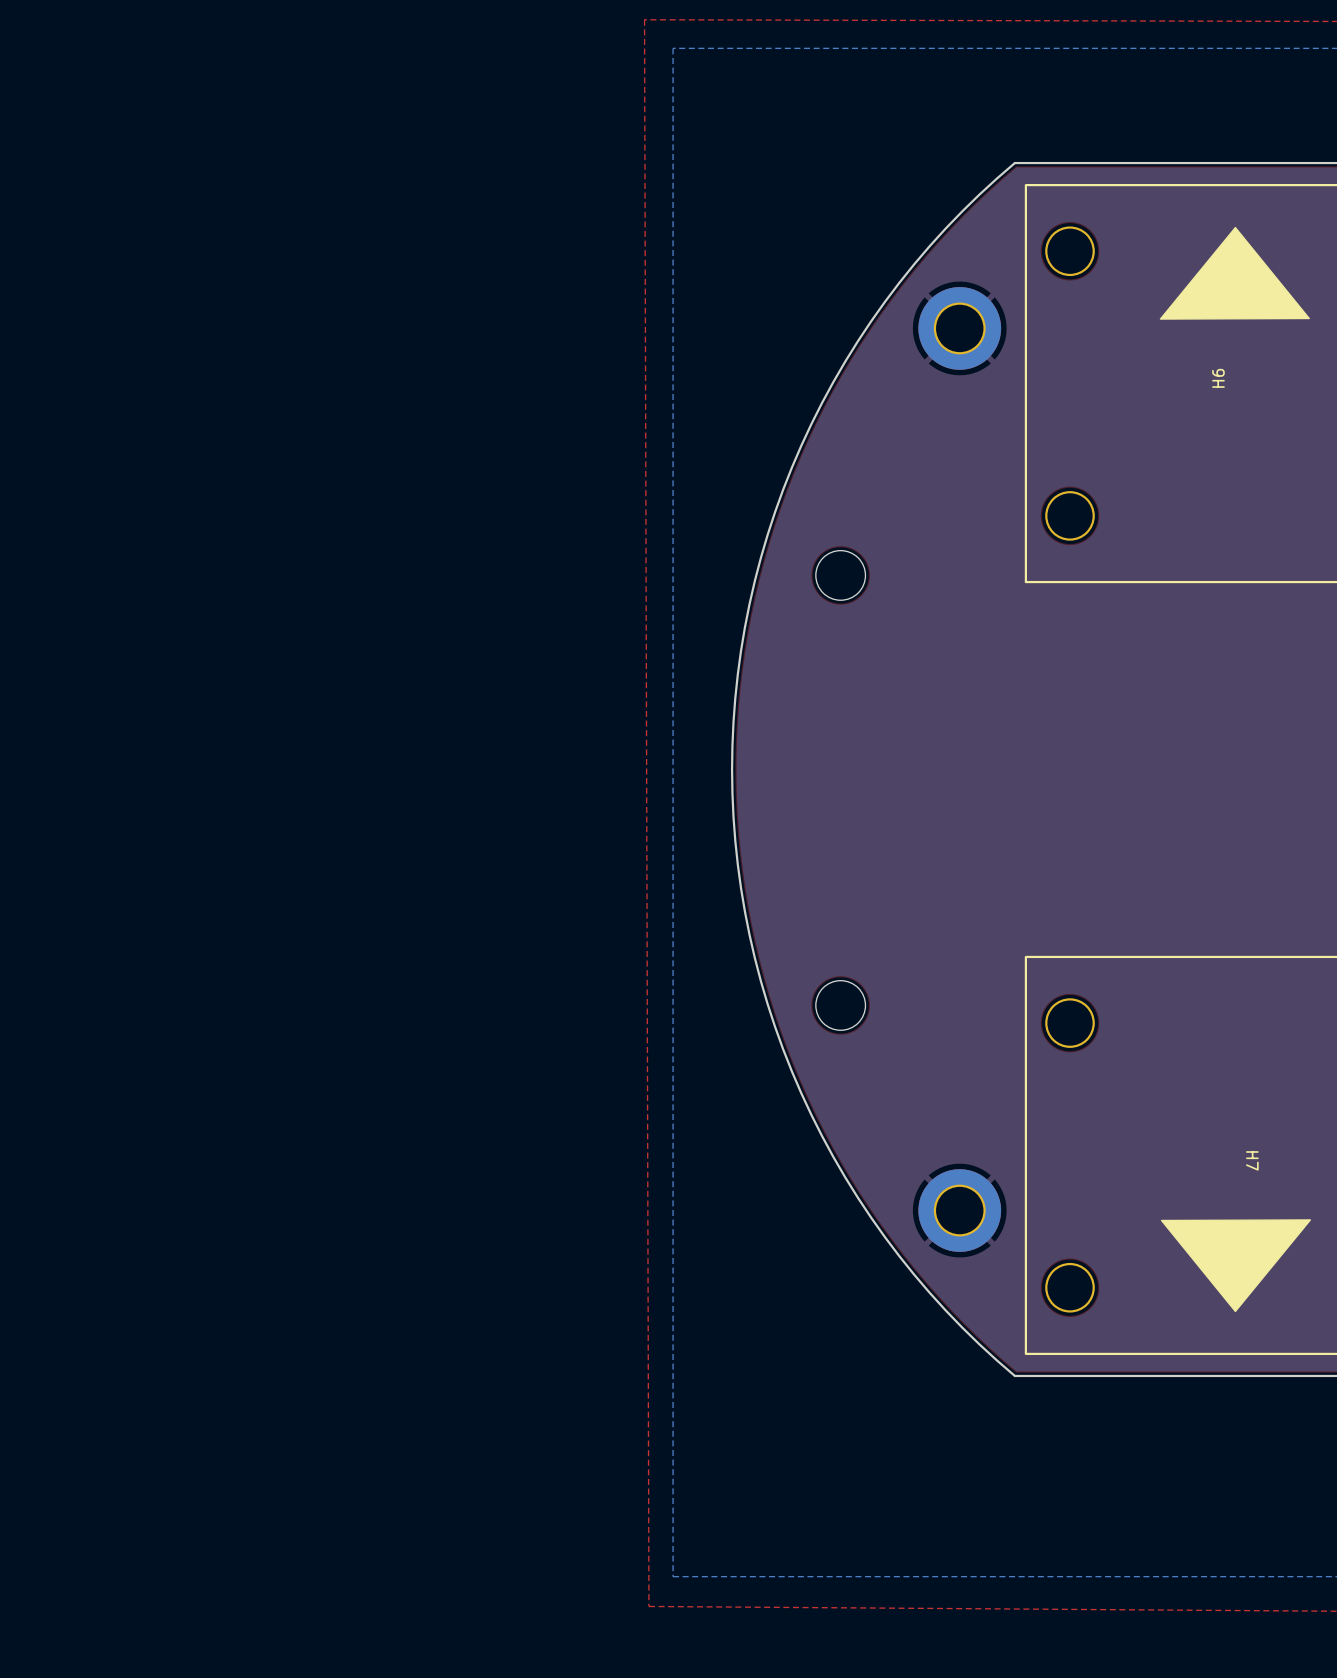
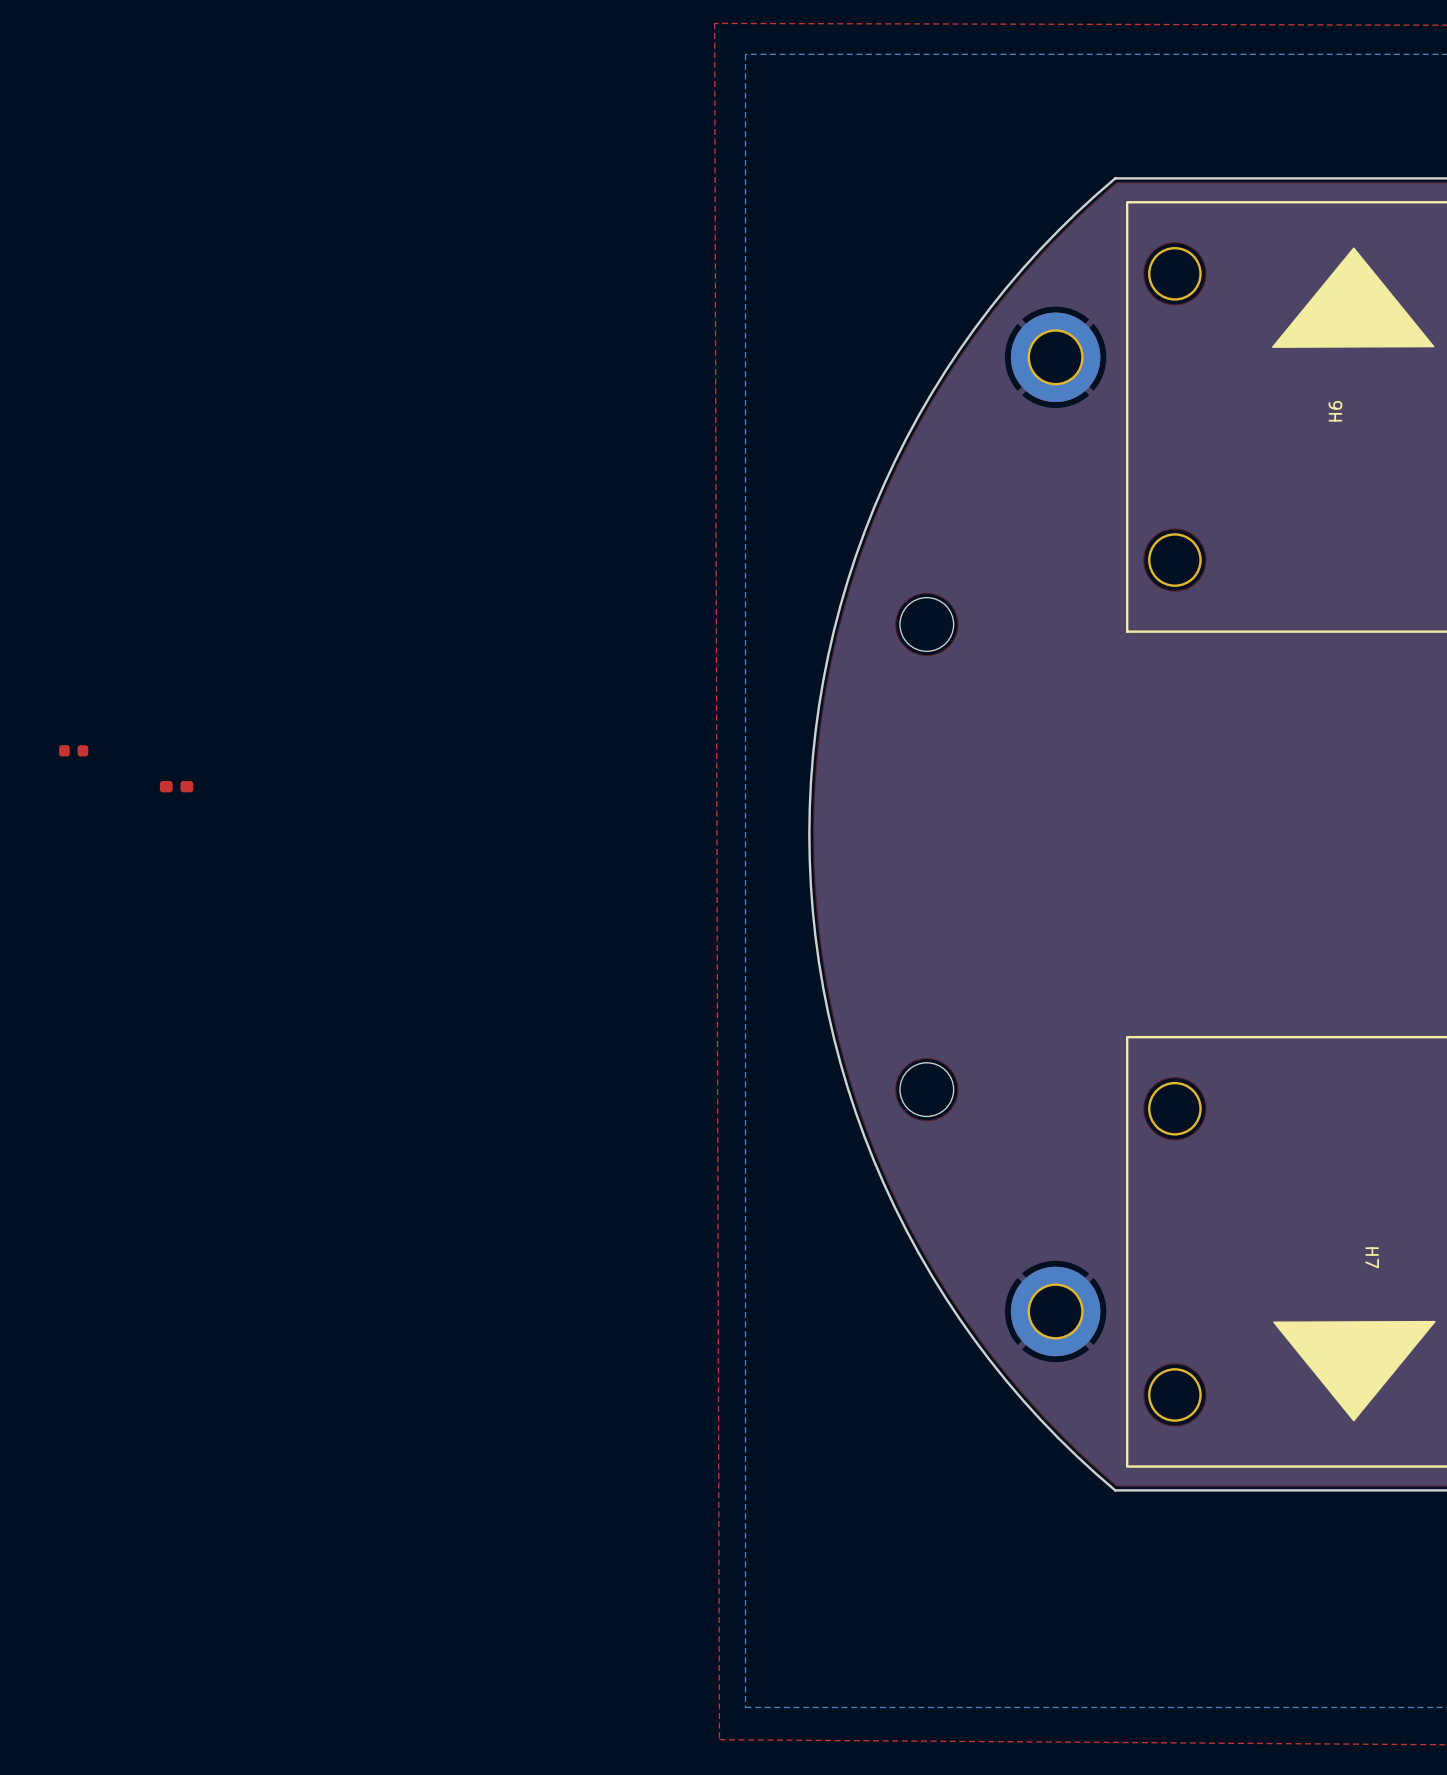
part: none -> (73, 750)
part: none -> (176, 786)

